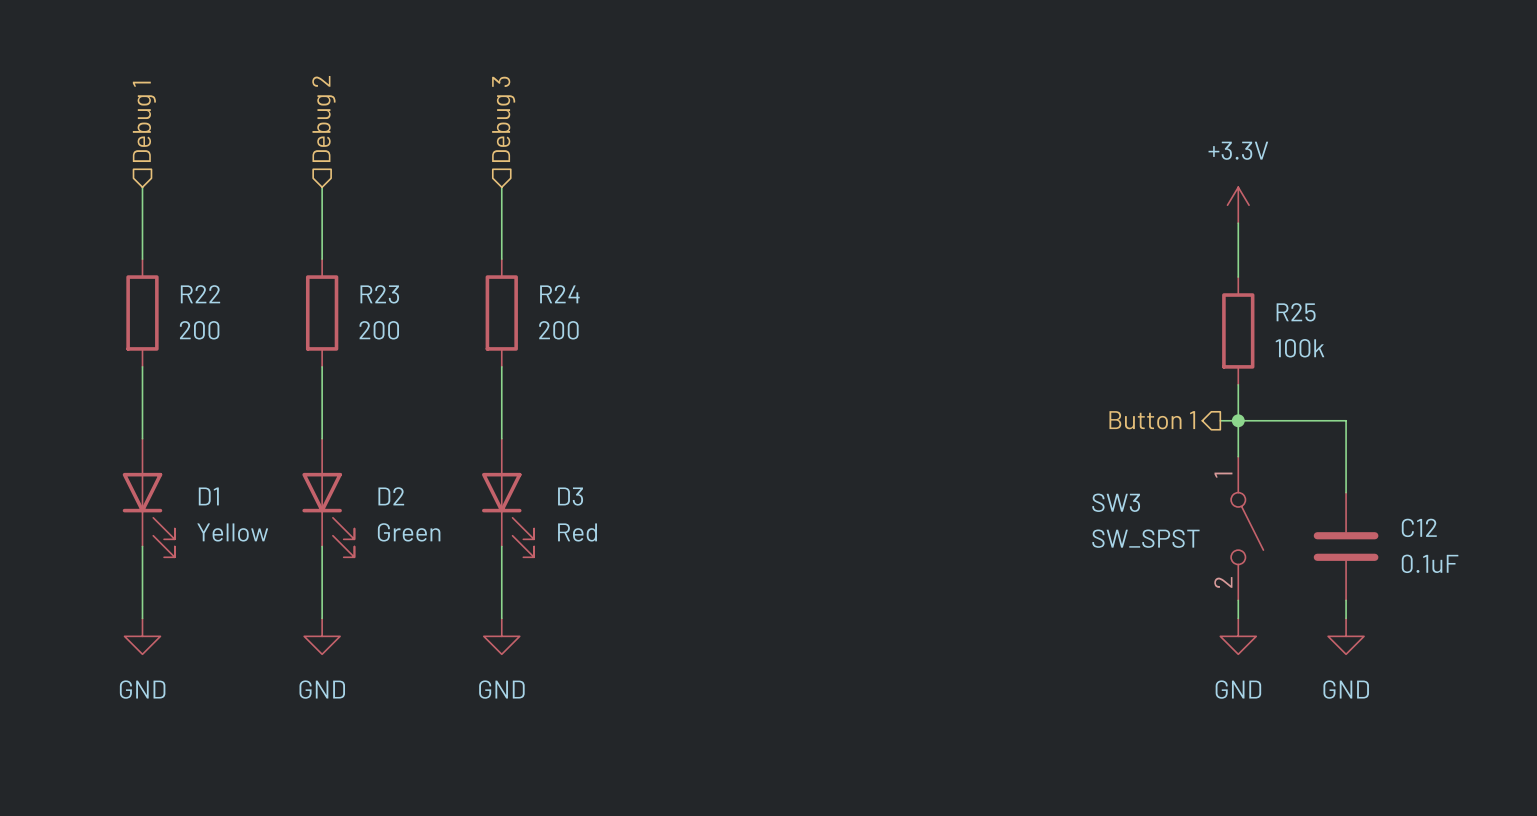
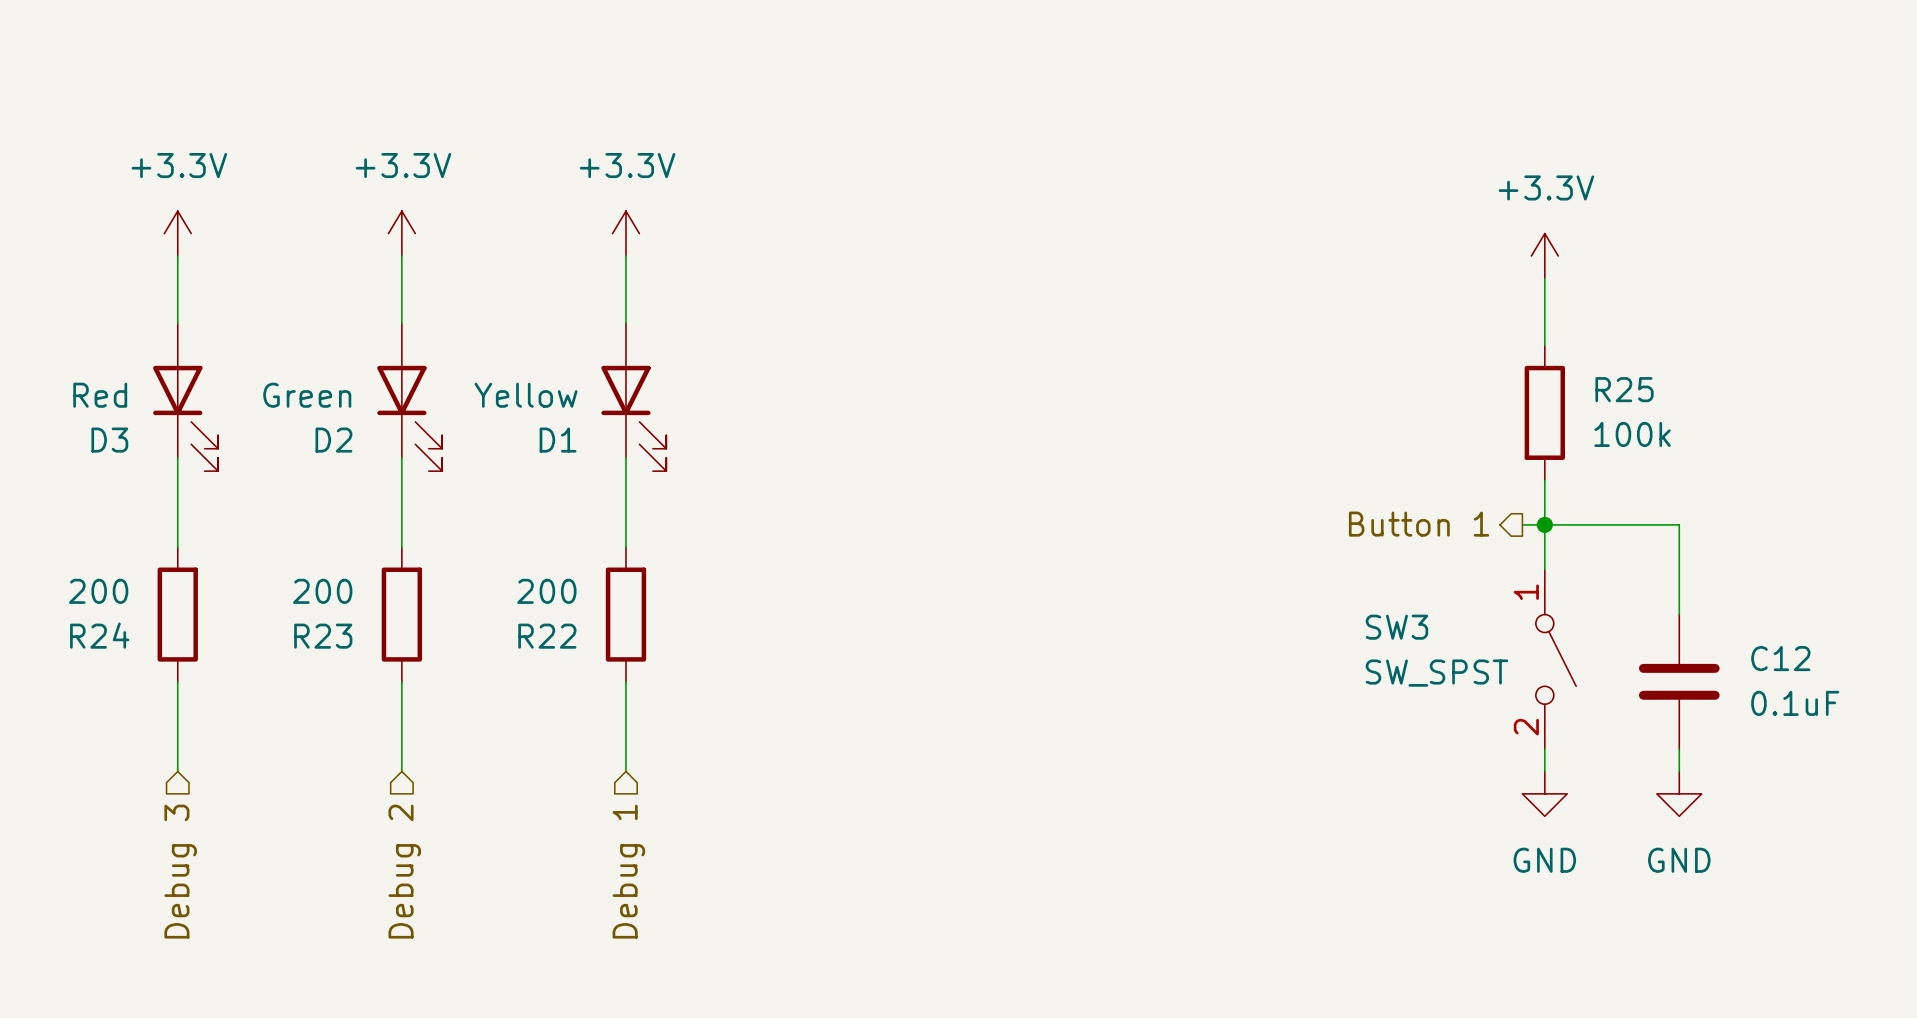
hierarchical label: Debug 2 (323, 119) -> none
hierarchical label: Debug 3 (503, 119) -> none
hierarchical label: Debug 1 (144, 121) -> none
power symbol: none -> +3.3V (177, 233)
power symbol: none -> +3.3V (401, 233)
power symbol: none -> +3.3V (625, 233)
R22 name position: R22 (200, 294) -> R22 (547, 636)
R23 name position: R23 (379, 294) -> R23 (323, 636)
R24 name position: R24 (559, 294) -> R24 (99, 635)
R22 position: (142, 312) -> (625, 614)
R23 position: (322, 312) -> (401, 614)
R24 position: (501, 312) -> (177, 614)
R22 value position: 200 (199, 330) -> 200 (546, 591)
R23 value position: 200 (379, 330) -> 200 (322, 591)
R24 value position: 200 (558, 330) -> 200 (98, 591)
D1 name position: D1 (208, 496) -> D1 (558, 440)
D2 name position: D2 (391, 496) -> D2 (333, 440)
D3 name position: D3 (570, 496) -> D3 (109, 440)
D1 position: (148, 498) -> (633, 397)
D2 position: (328, 498) -> (409, 397)
D3 position: (508, 498) -> (185, 397)
D1 value position: Yellow (232, 532) -> Yellow (526, 395)
D2 value position: Green (409, 532) -> Green (307, 395)
D3 value position: Red (577, 532) -> Red (100, 395)
power symbol: GND (142, 636) -> none
power symbol: GND (322, 636) -> none
power symbol: GND (501, 636) -> none
hierarchical label: none -> Debug 1 (628, 871)
hierarchical label: none -> Debug 3 (180, 871)
hierarchical label: none -> Debug 2 (404, 871)

